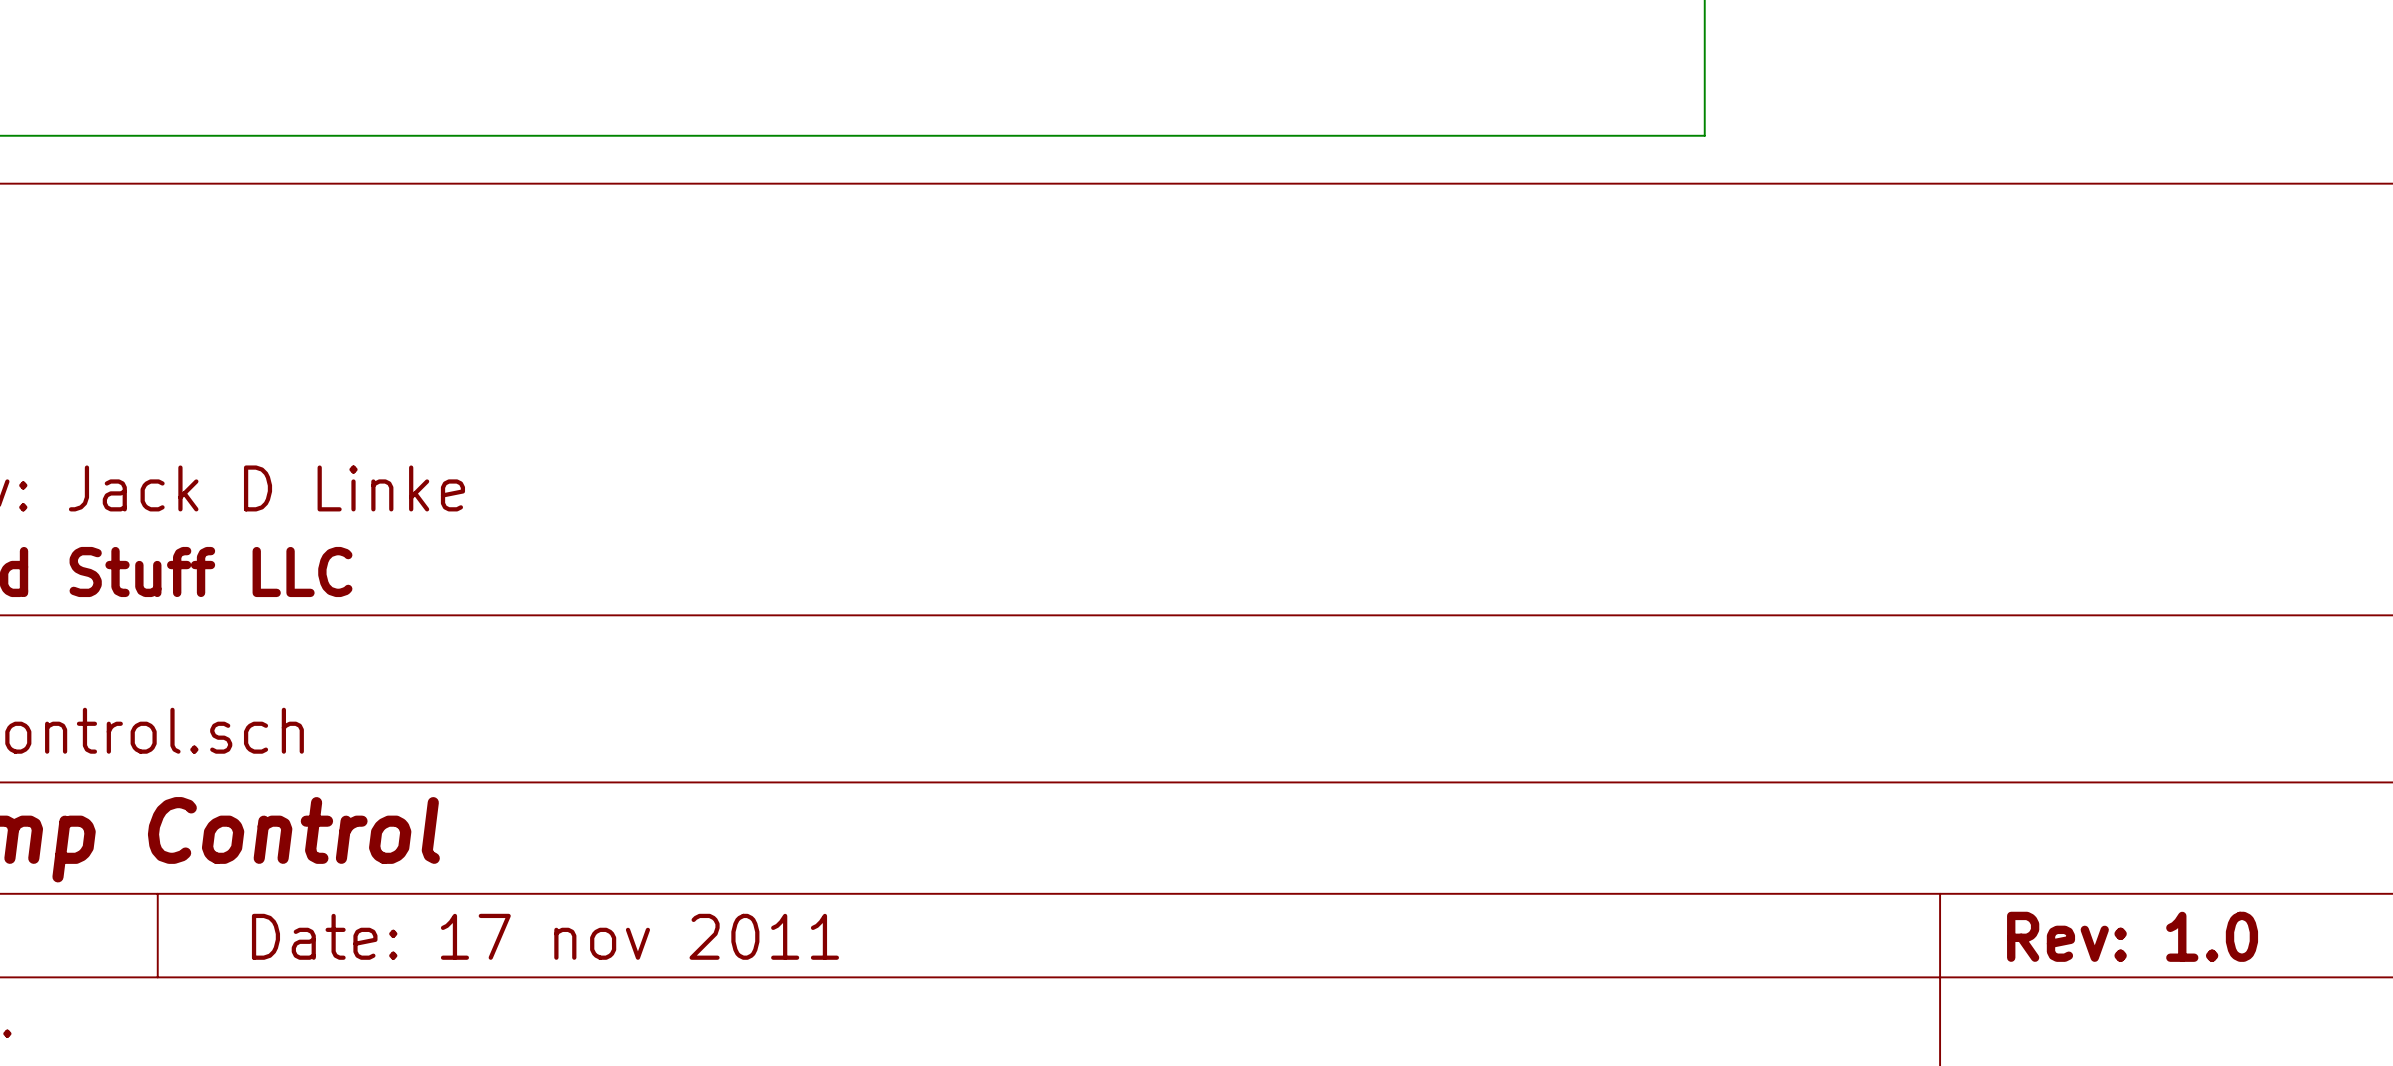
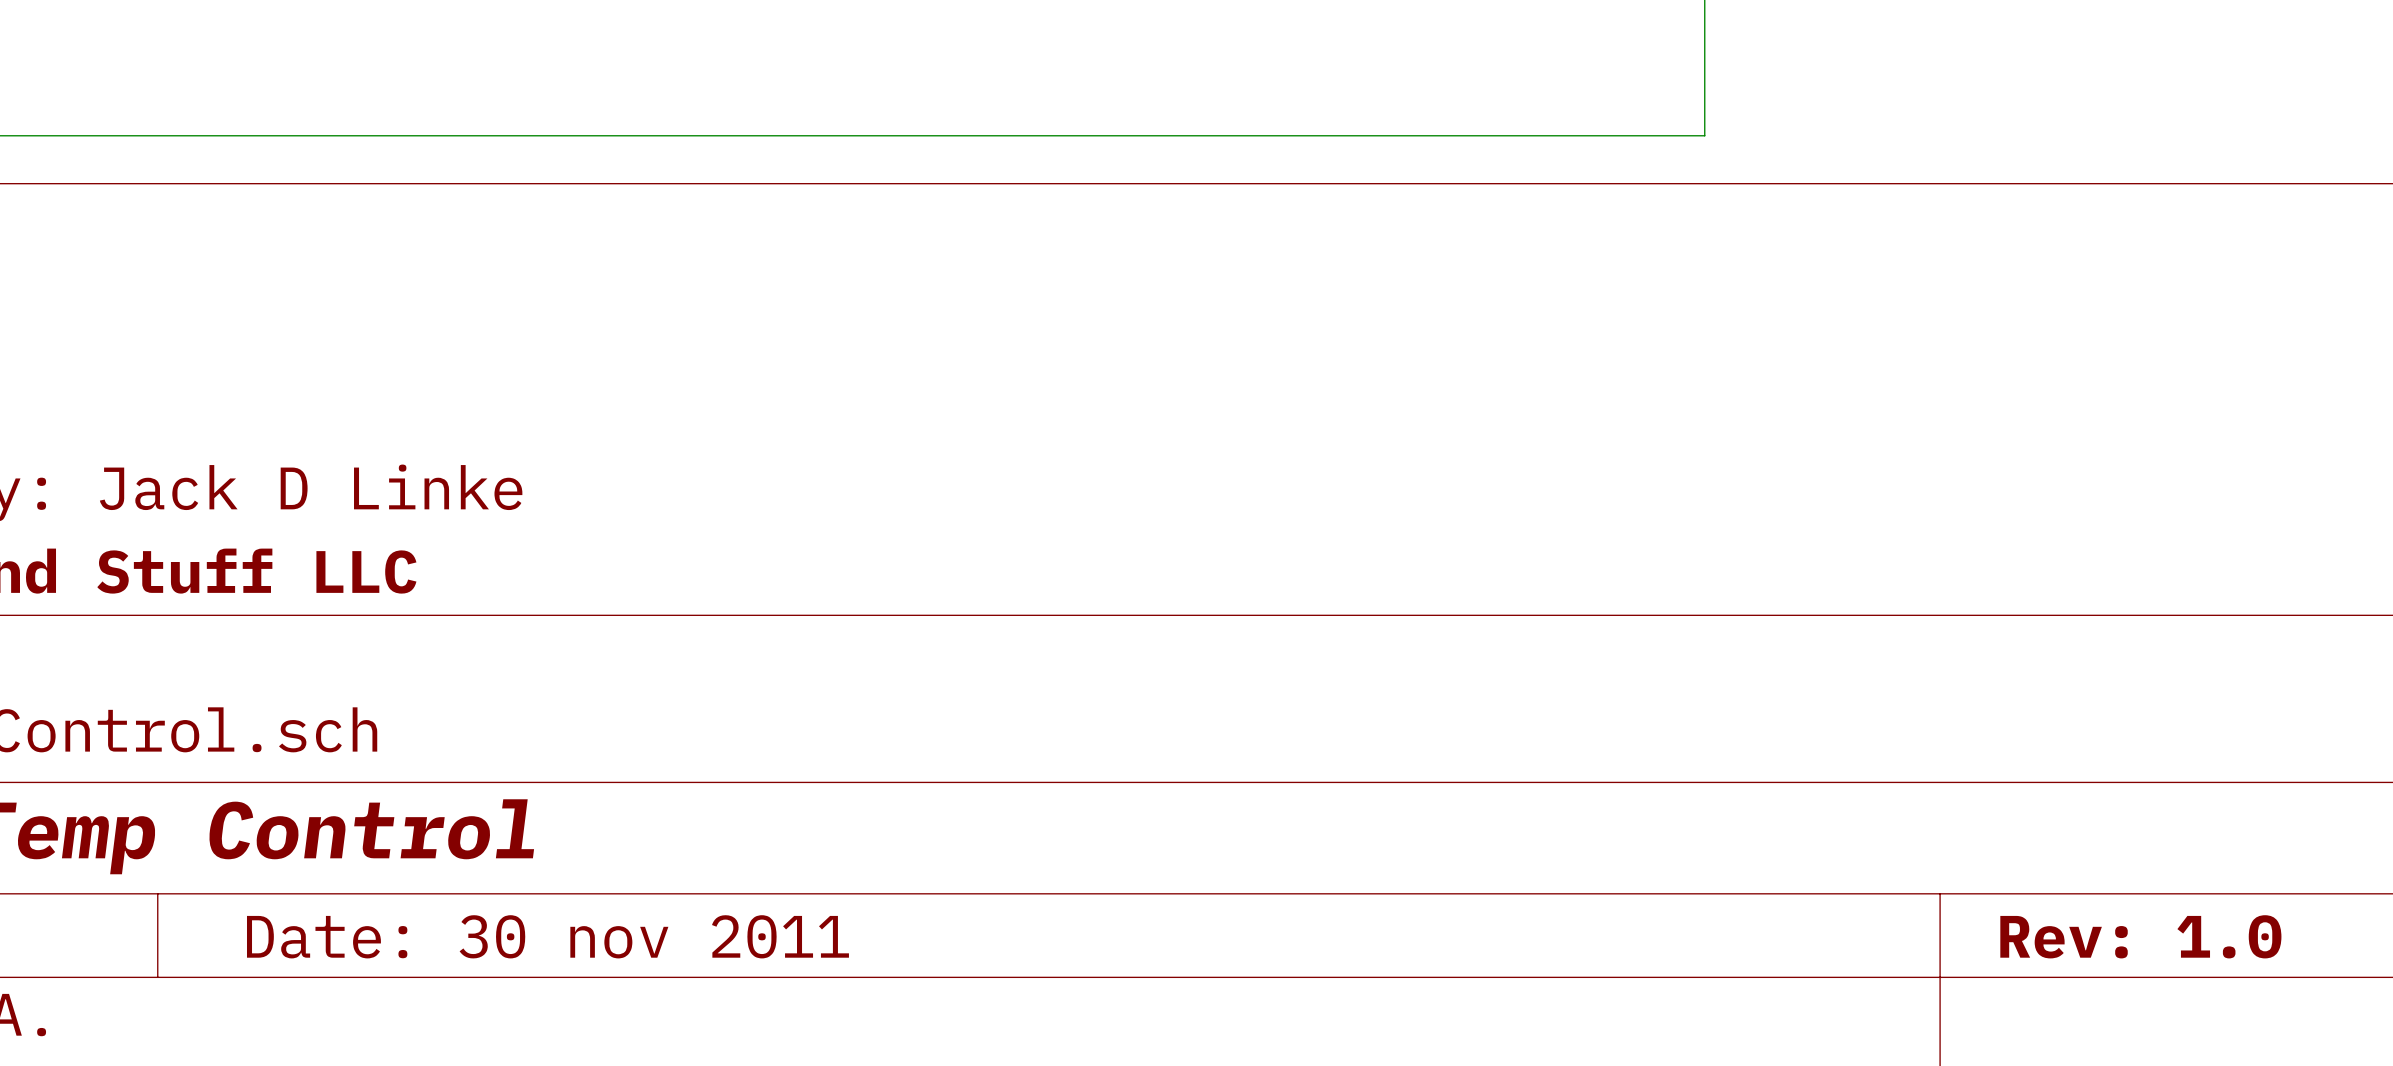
title block: Date: 17 nov 2011 (545, 936) -> Date: 30 nov 2011 (547, 936)

